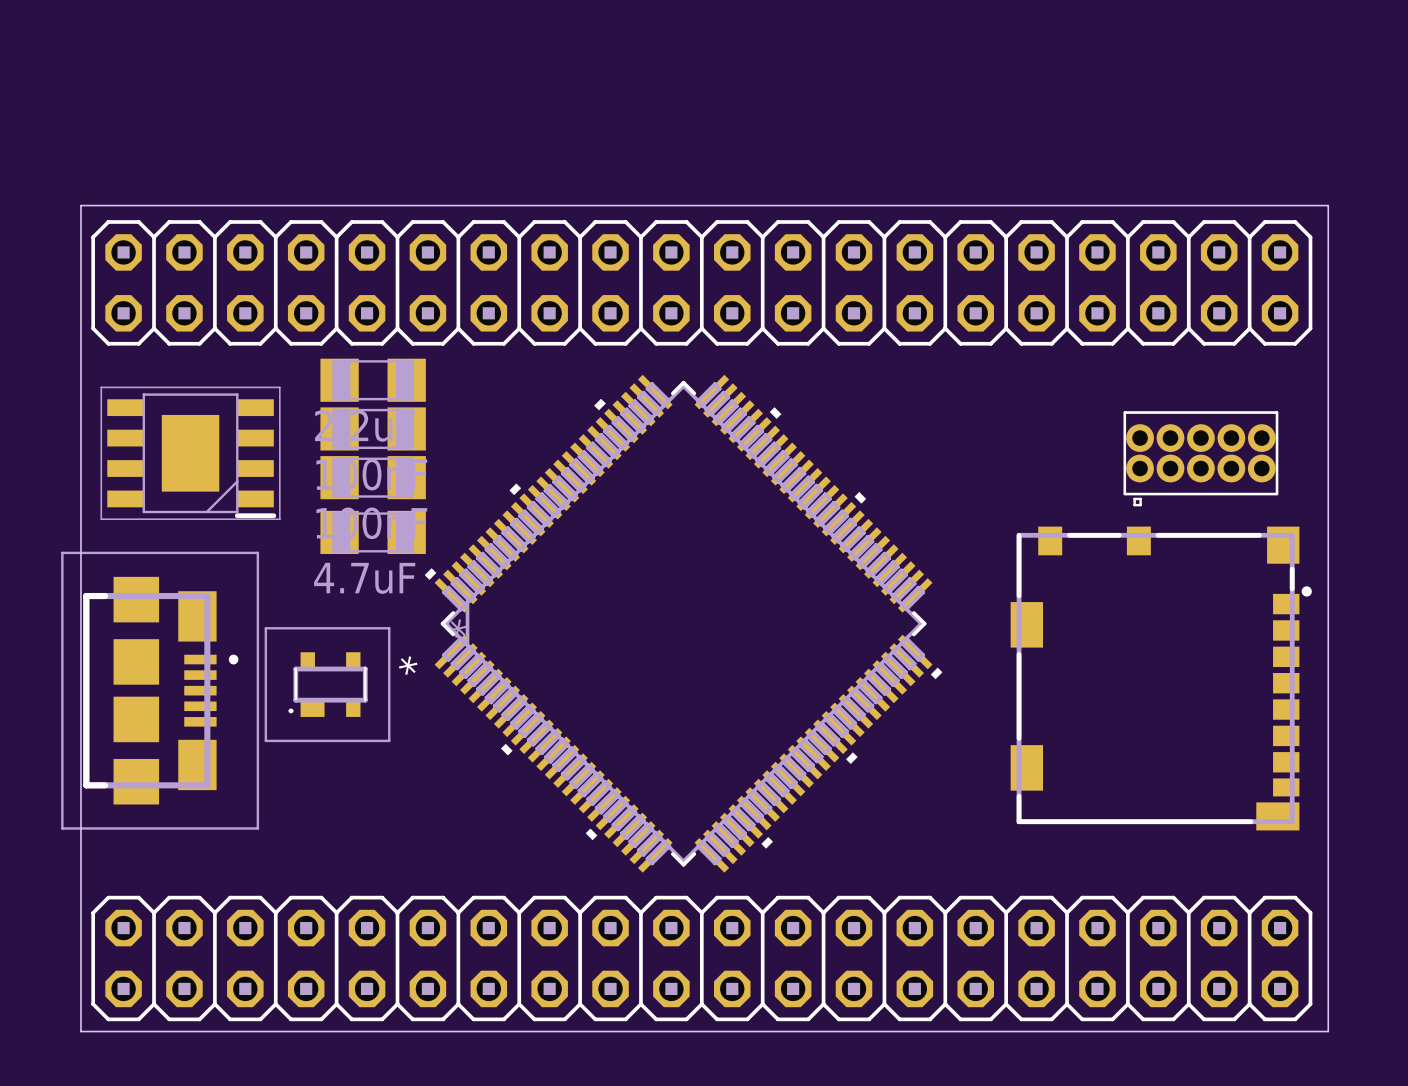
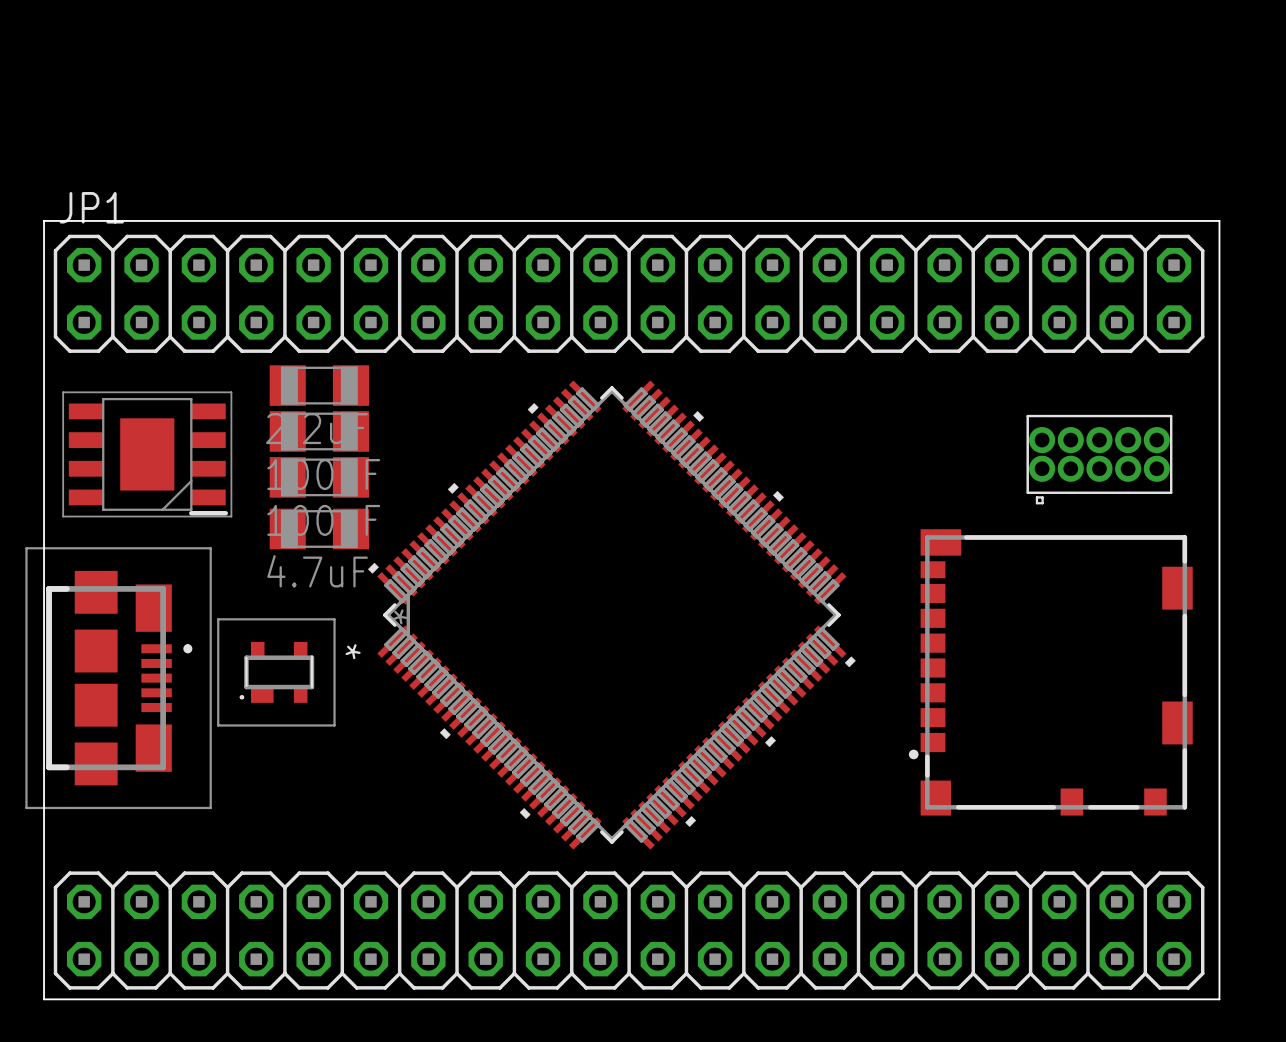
JP1 name: none -> JP1 (91, 207)
part rotation: 0° (1161, 678) -> 180° (1050, 672)

